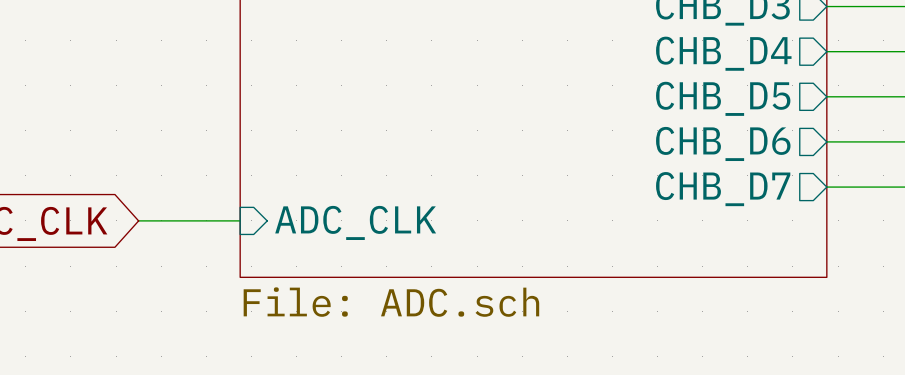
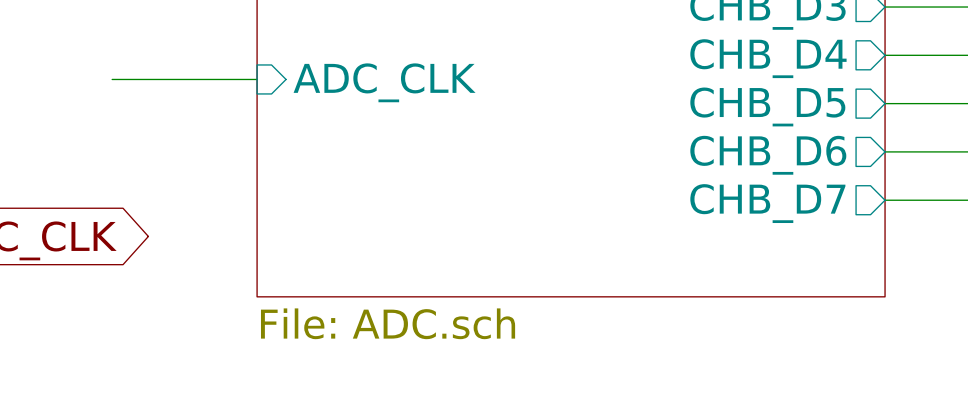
wire: none -> (112, 79) (257, 79)
wire: (138, 220) (240, 220) -> none
sheet pin position: ADC_CLK (355, 222) -> ADC_CLK (384, 82)

